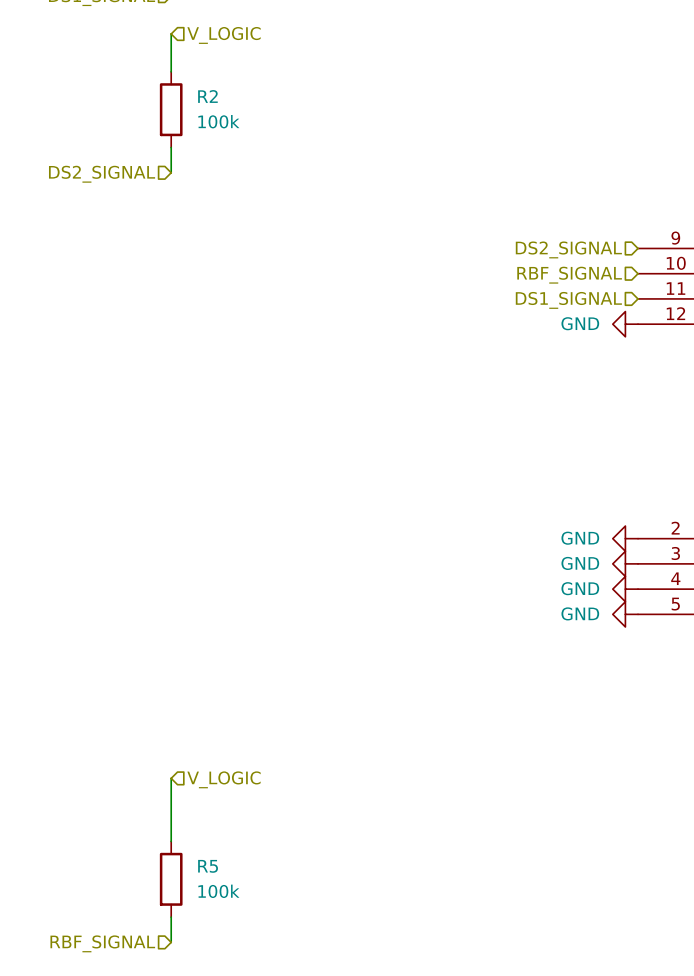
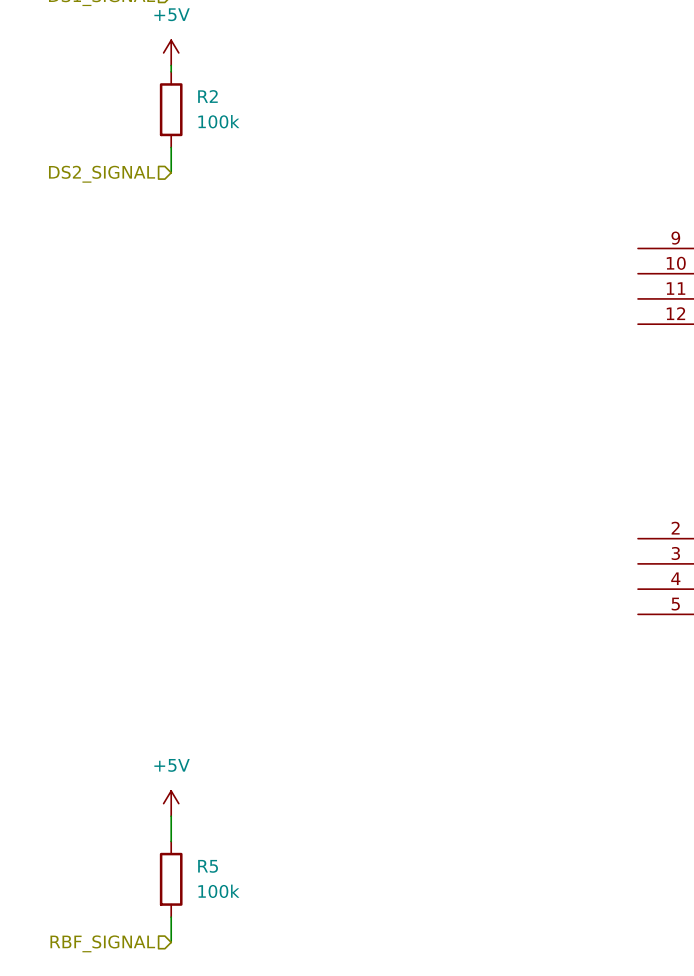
hierarchical label: V_LOGIC (224, 35) -> none
power symbol: none -> +5V (171, 52)
hierarchical label: DS2_SIGNAL (568, 249) -> none
hierarchical label: RBF_SIGNAL (569, 275) -> none
hierarchical label: DS1_SIGNAL (568, 300) -> none
power symbol: GND (625, 324) -> none
power symbol: GND (625, 538) -> none
power symbol: GND (625, 563) -> none
power symbol: GND (625, 589) -> none
power symbol: GND (625, 614) -> none
hierarchical label: V_LOGIC (224, 779) -> none
power symbol: none -> +5V (171, 803)

